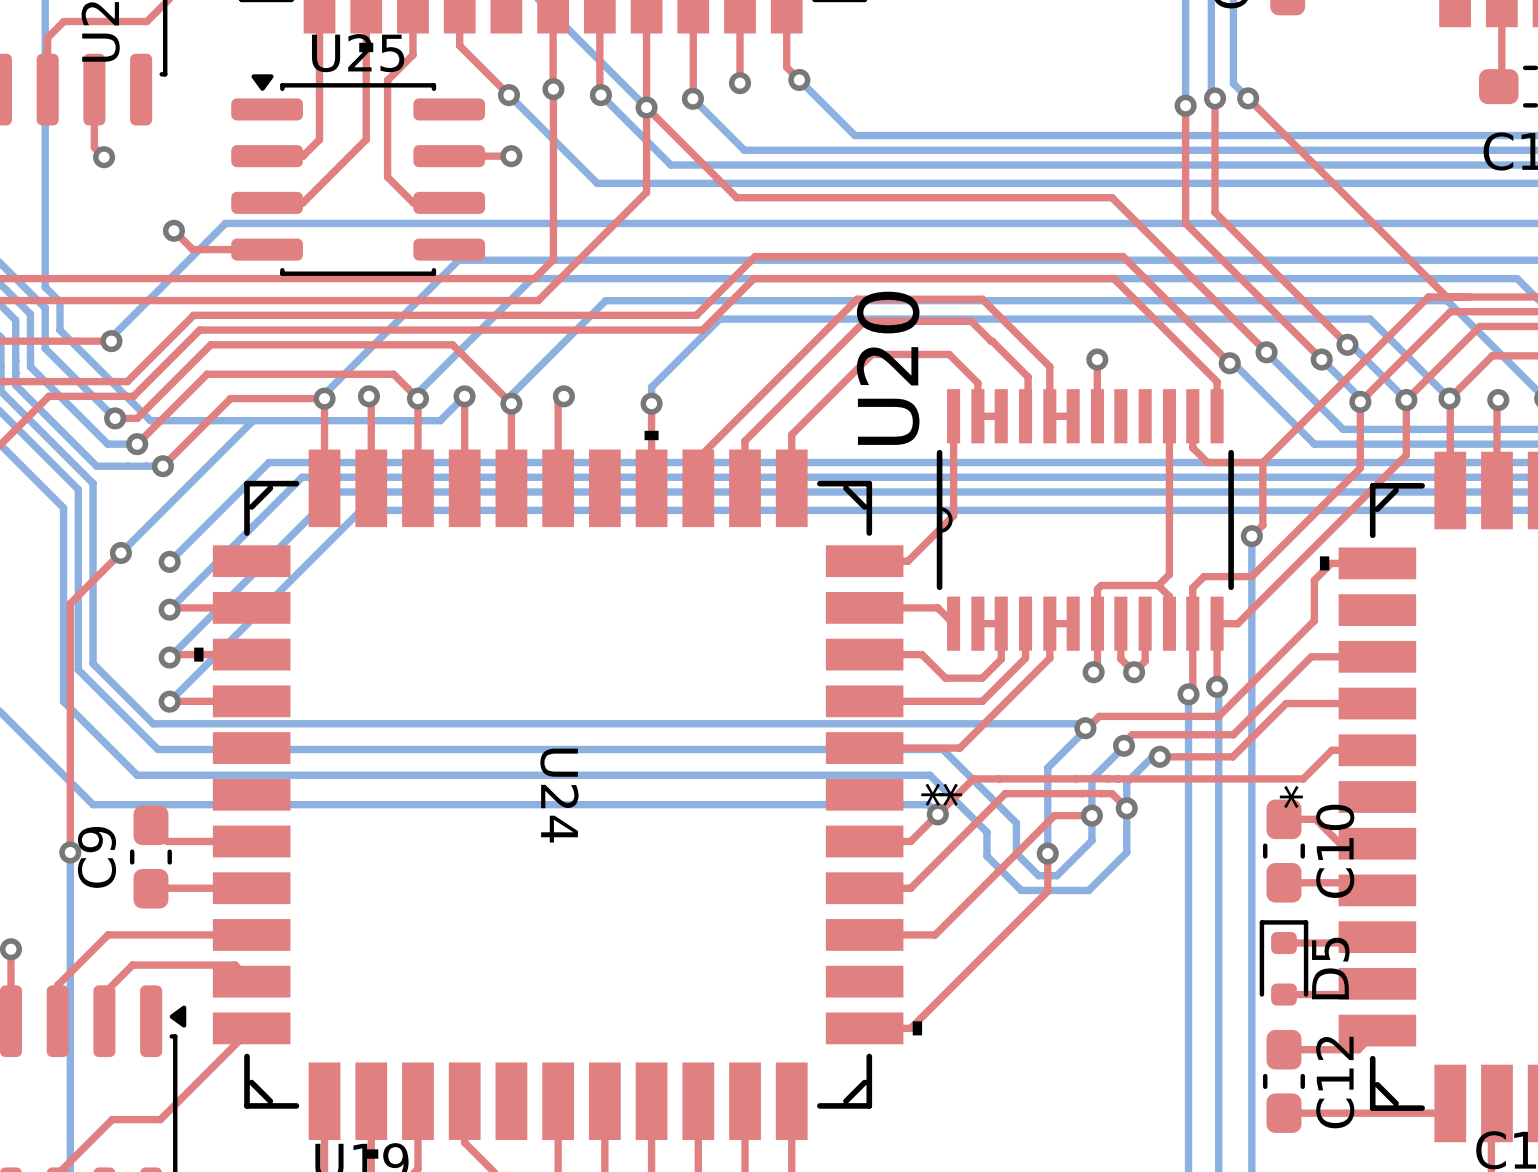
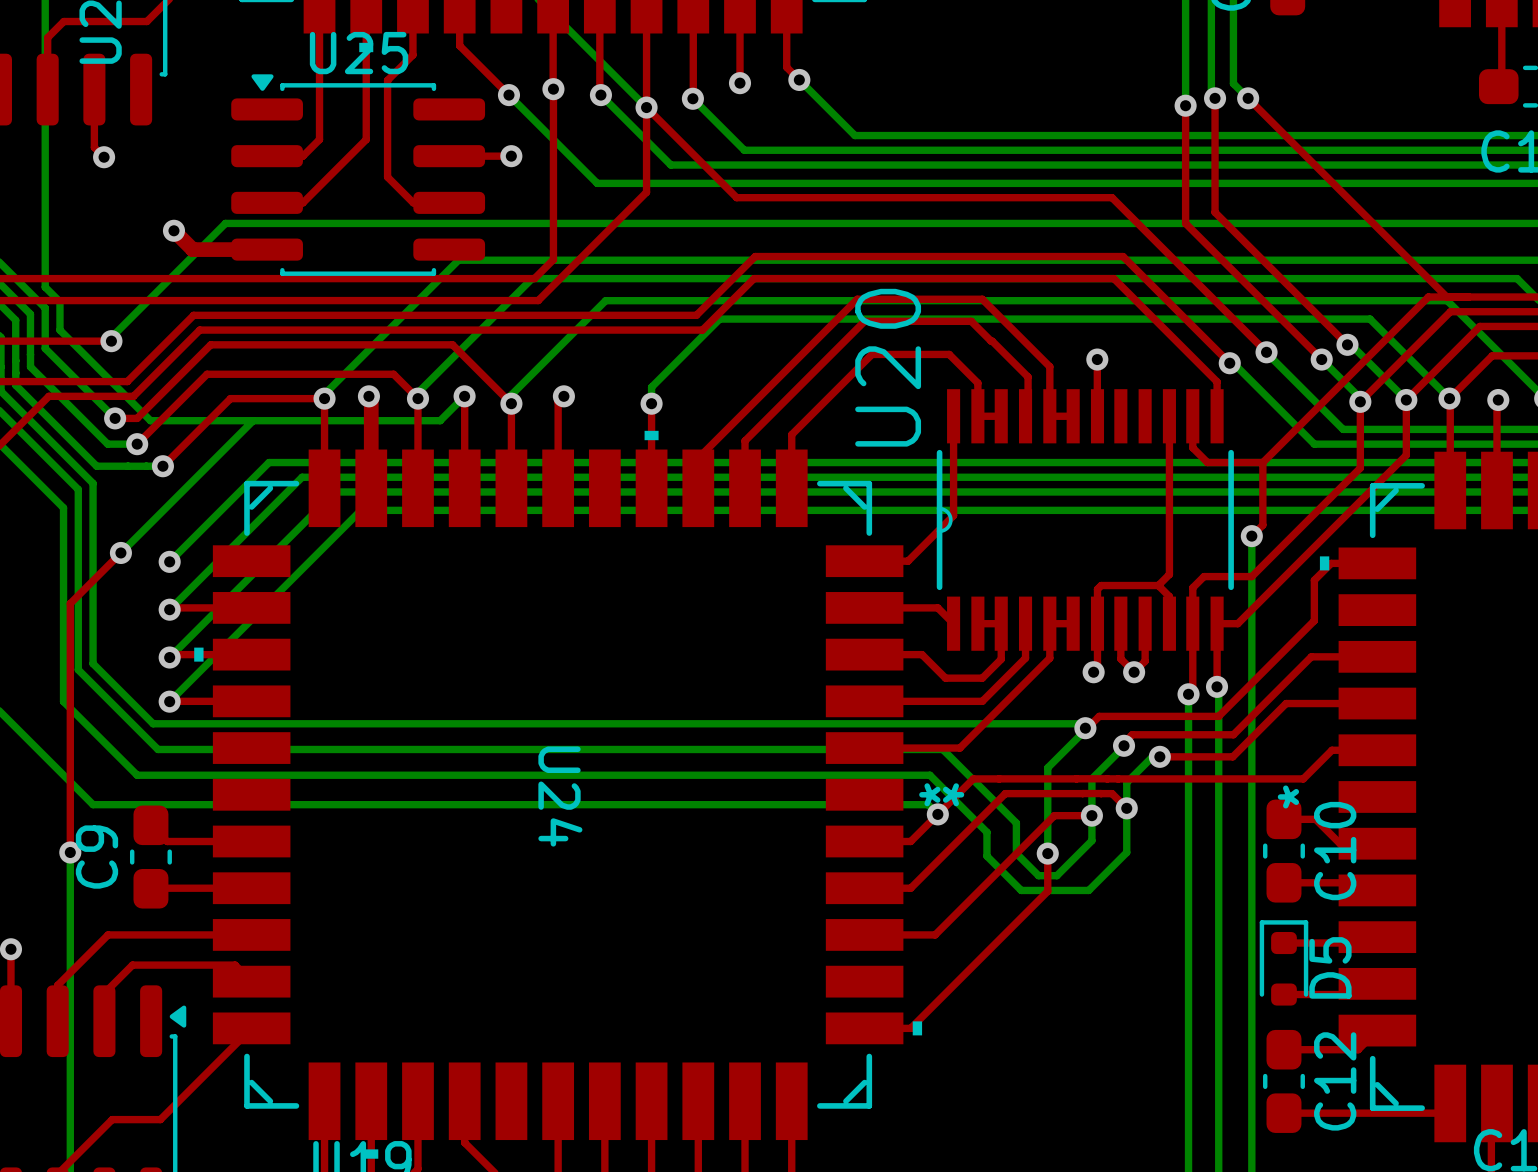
top track width: thin (173, 230) (192, 249) (267, 249) -> thick (173, 230) (192, 249) (267, 249)
top track width: thin (368, 396) (371, 398) (371, 488) -> thick (368, 396) (371, 398) (371, 488)

